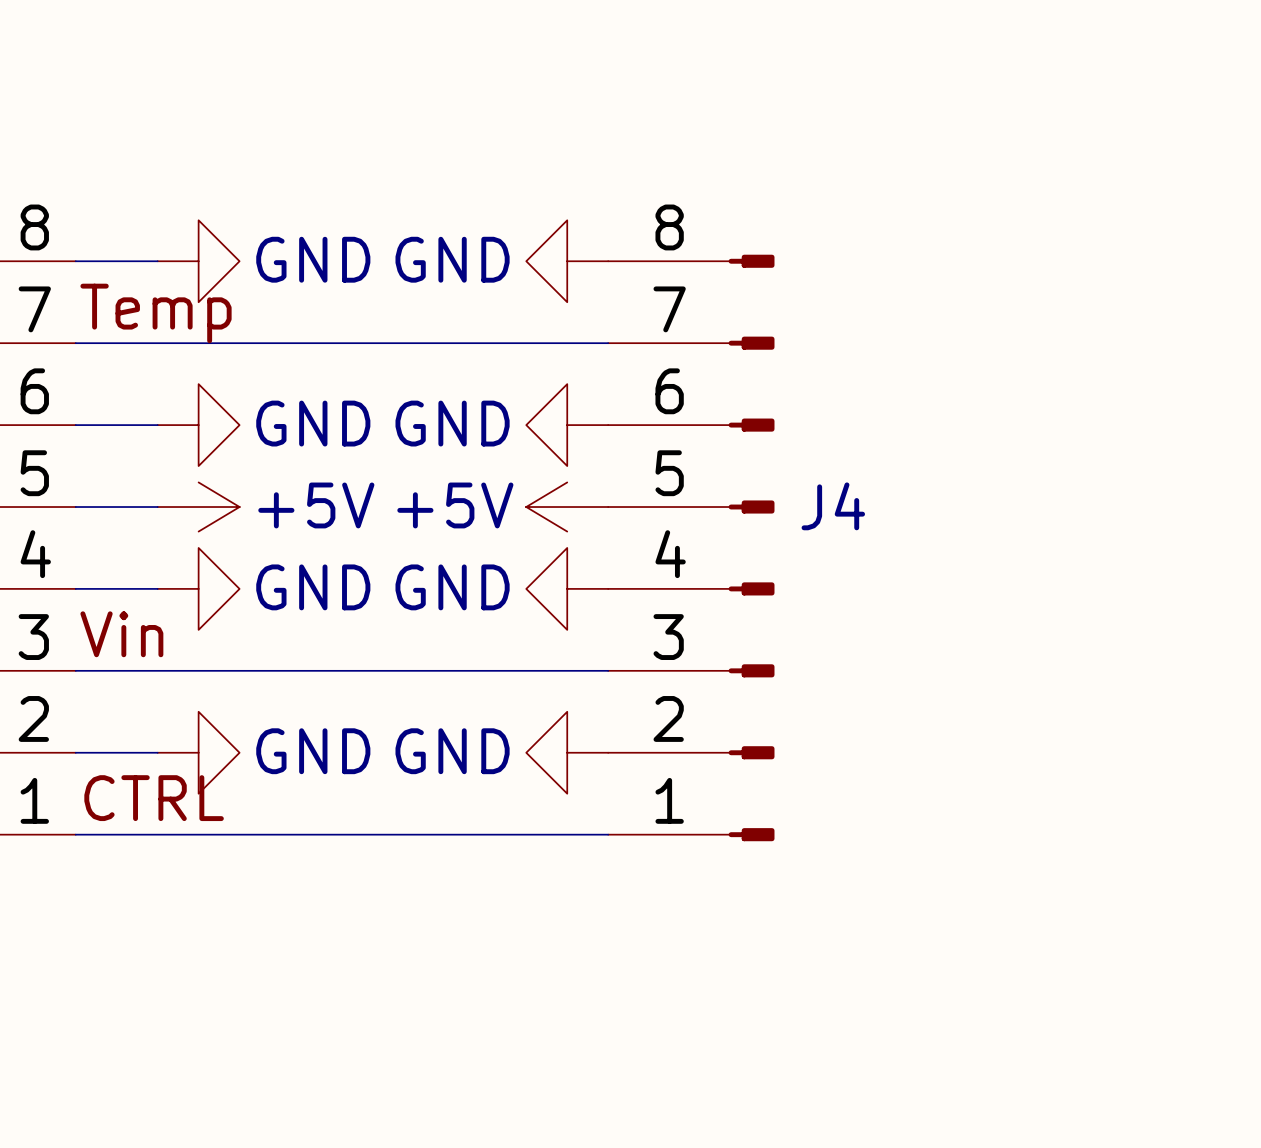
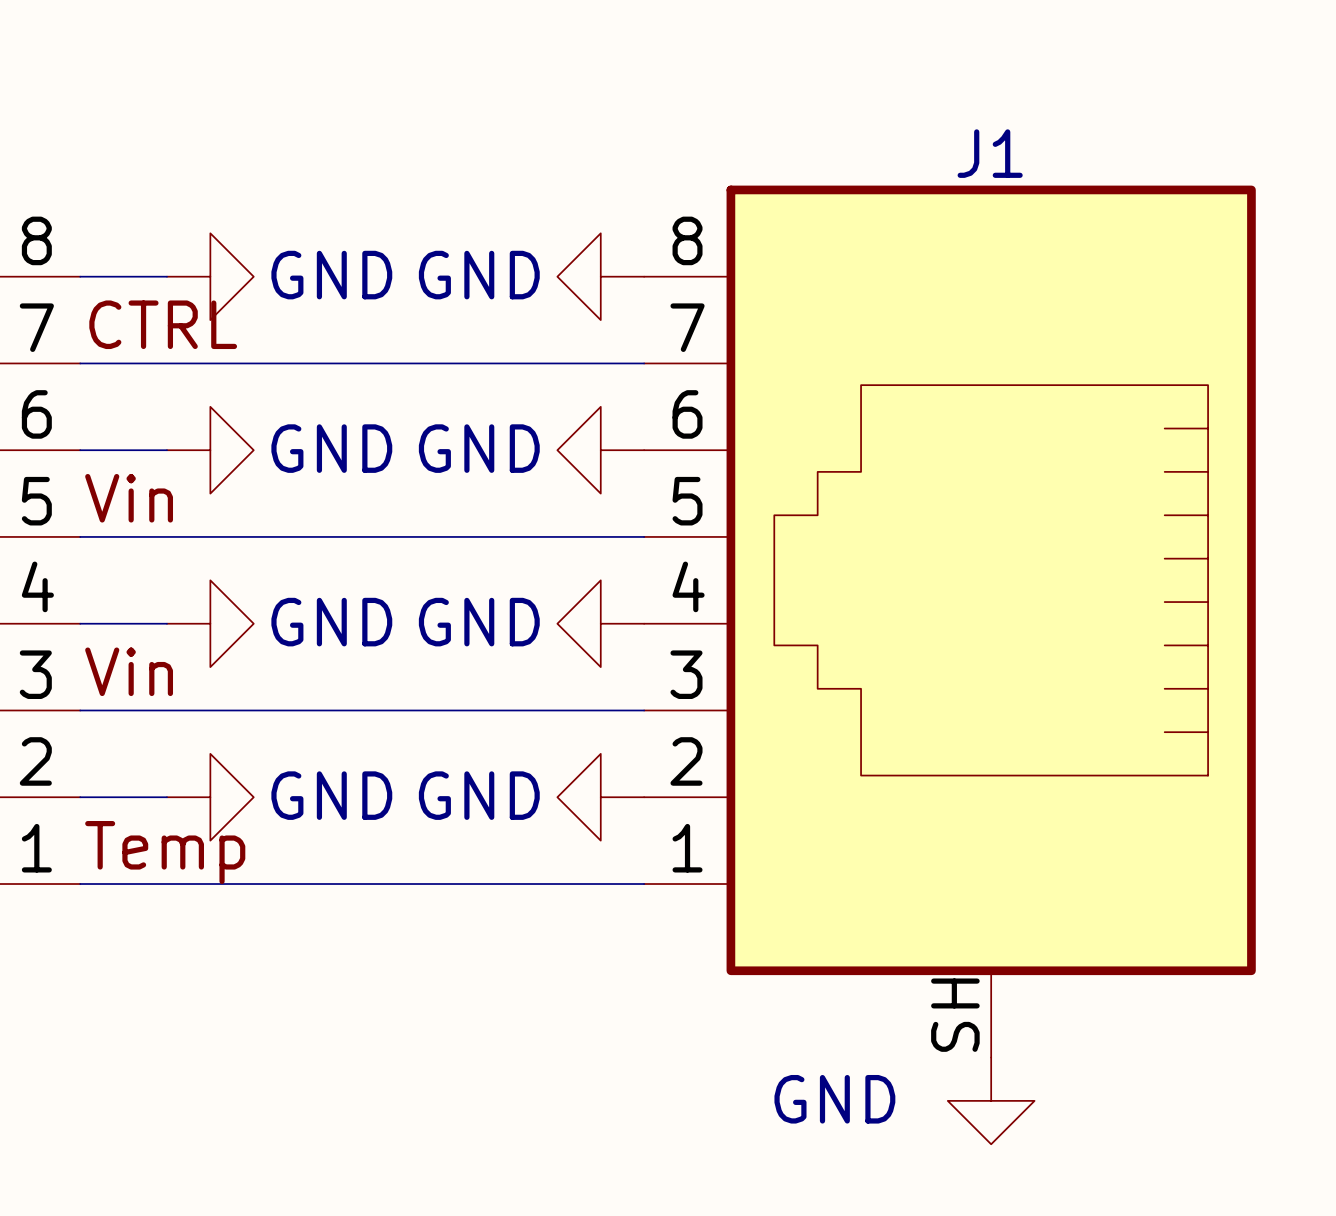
label: Temp (156, 313) -> CTRL (163, 324)
label: none -> Vin (129, 498)
wire: none -> (166, 536) (644, 536)
power symbol: +5V (198, 507) -> none
power symbol: +5V (567, 507) -> none
J4: (691, 547) -> none
J1: none -> (949, 621)
label: CTRL (154, 798) -> Temp (165, 852)
power symbol: none -> GND (991, 1100)

